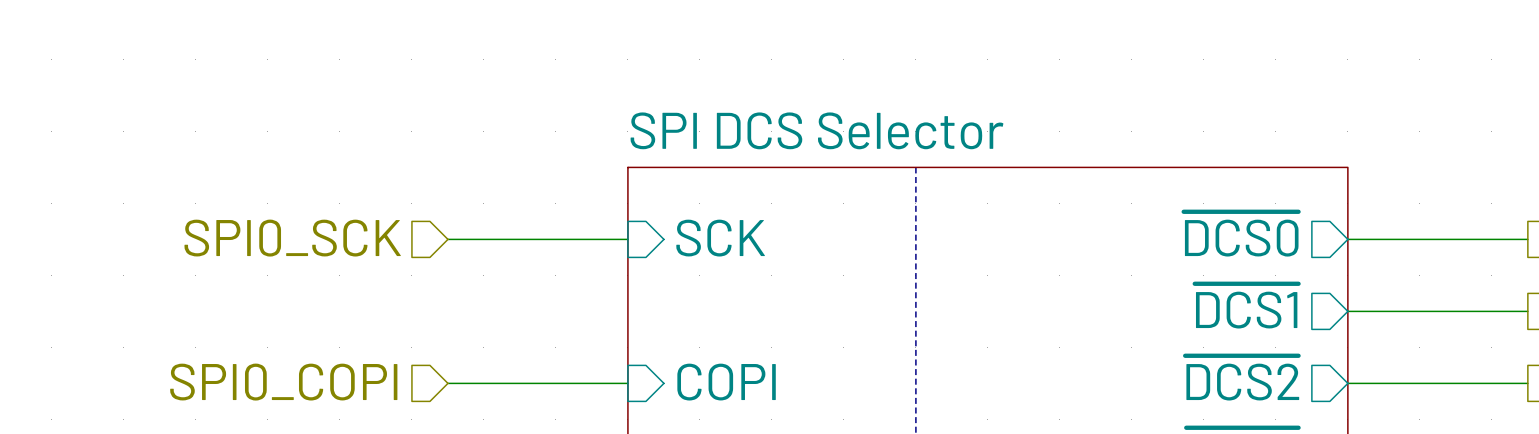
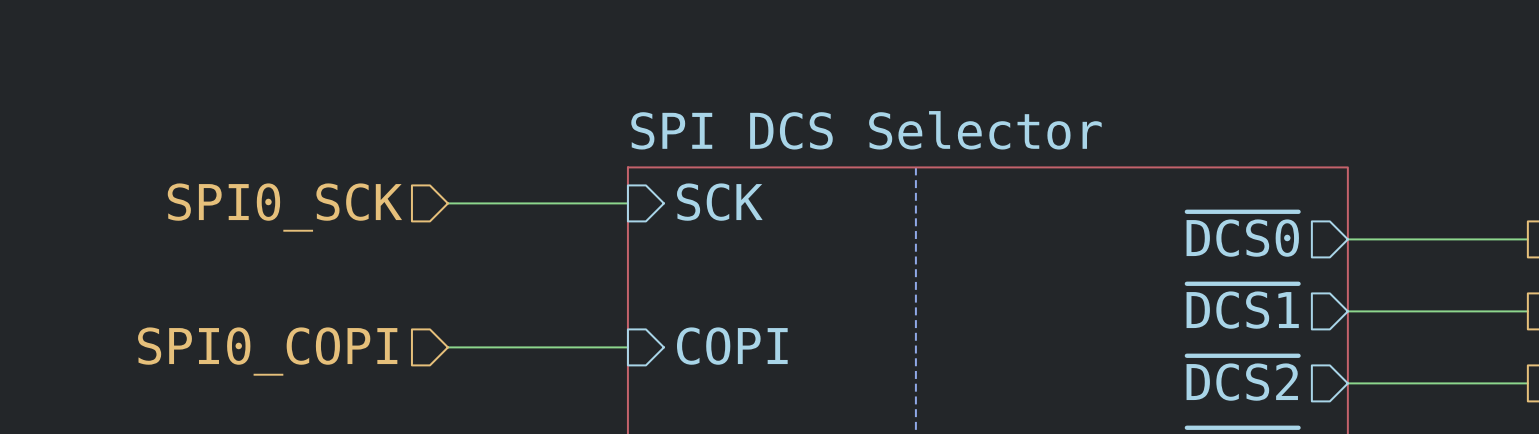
hierarchical label position: SPI0_SCK (292, 238) -> SPI0_SCK (284, 207)
sheet pin position: SCK (720, 238) -> SCK (719, 202)
wire: (447, 239) (627, 239) -> (447, 203) (627, 203)
hierarchical label position: SPI0_COPI (283, 382) -> SPI0_COPI (267, 351)
sheet pin position: COPI (726, 382) -> COPI (732, 346)
wire: (447, 383) (627, 383) -> (447, 347) (627, 347)

